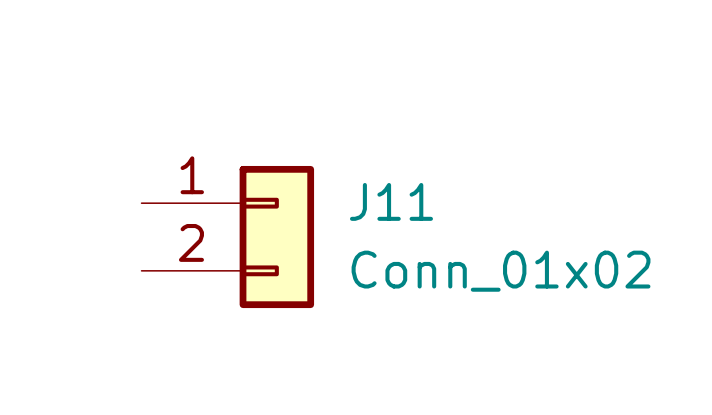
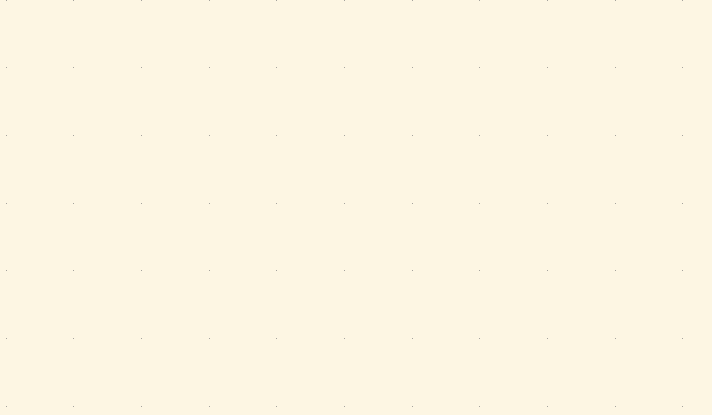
J11: Conn_01x02 (227, 237) -> none

